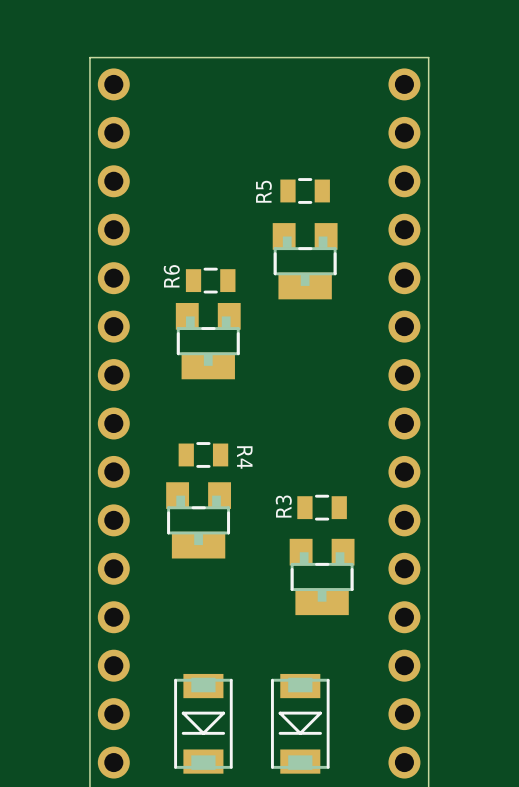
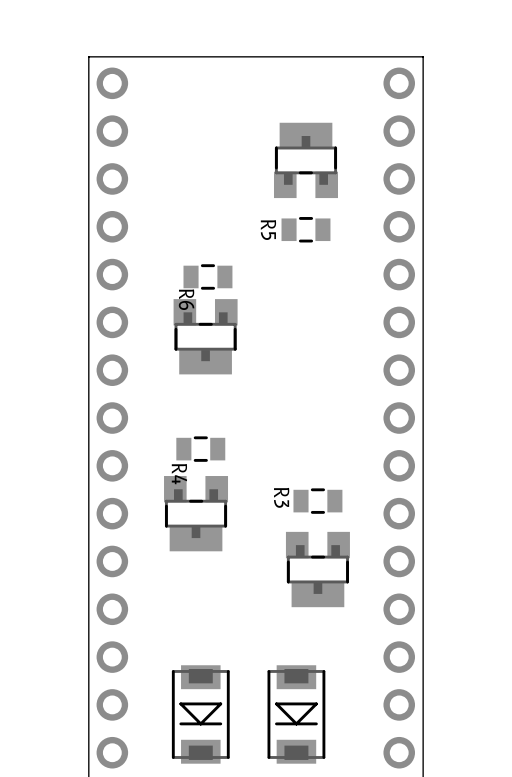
R5 position: (305, 190) -> (305, 229)
R5 name rotation: 0° (263, 191) -> 180° (268, 230)
part rotation: 0° (305, 261) -> 180° (305, 160)
part position: (305, 261) -> (305, 160)
R6 name rotation: 0° (171, 276) -> 180° (186, 299)
R6 name position: R6 (171, 276) -> R6 (186, 299)
R4 name position: R4 (244, 457) -> R4 (179, 474)
R3 name rotation: 0° (283, 506) -> 180° (281, 497)

